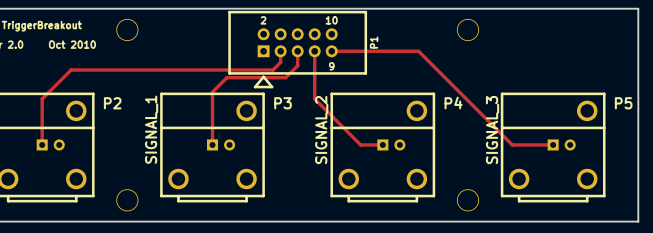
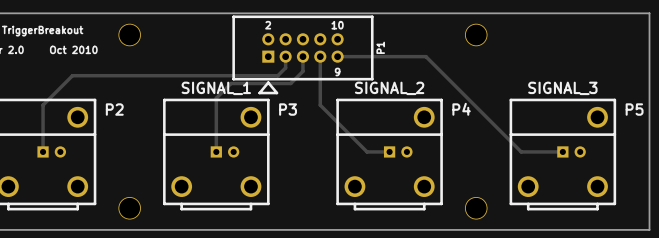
P3 value rotation: 0° (151, 129) -> 90° clockwise (216, 88)
P4 value rotation: 0° (321, 130) -> 90° clockwise (389, 88)
P5 value rotation: 0° (492, 130) -> 90° clockwise (562, 88)

